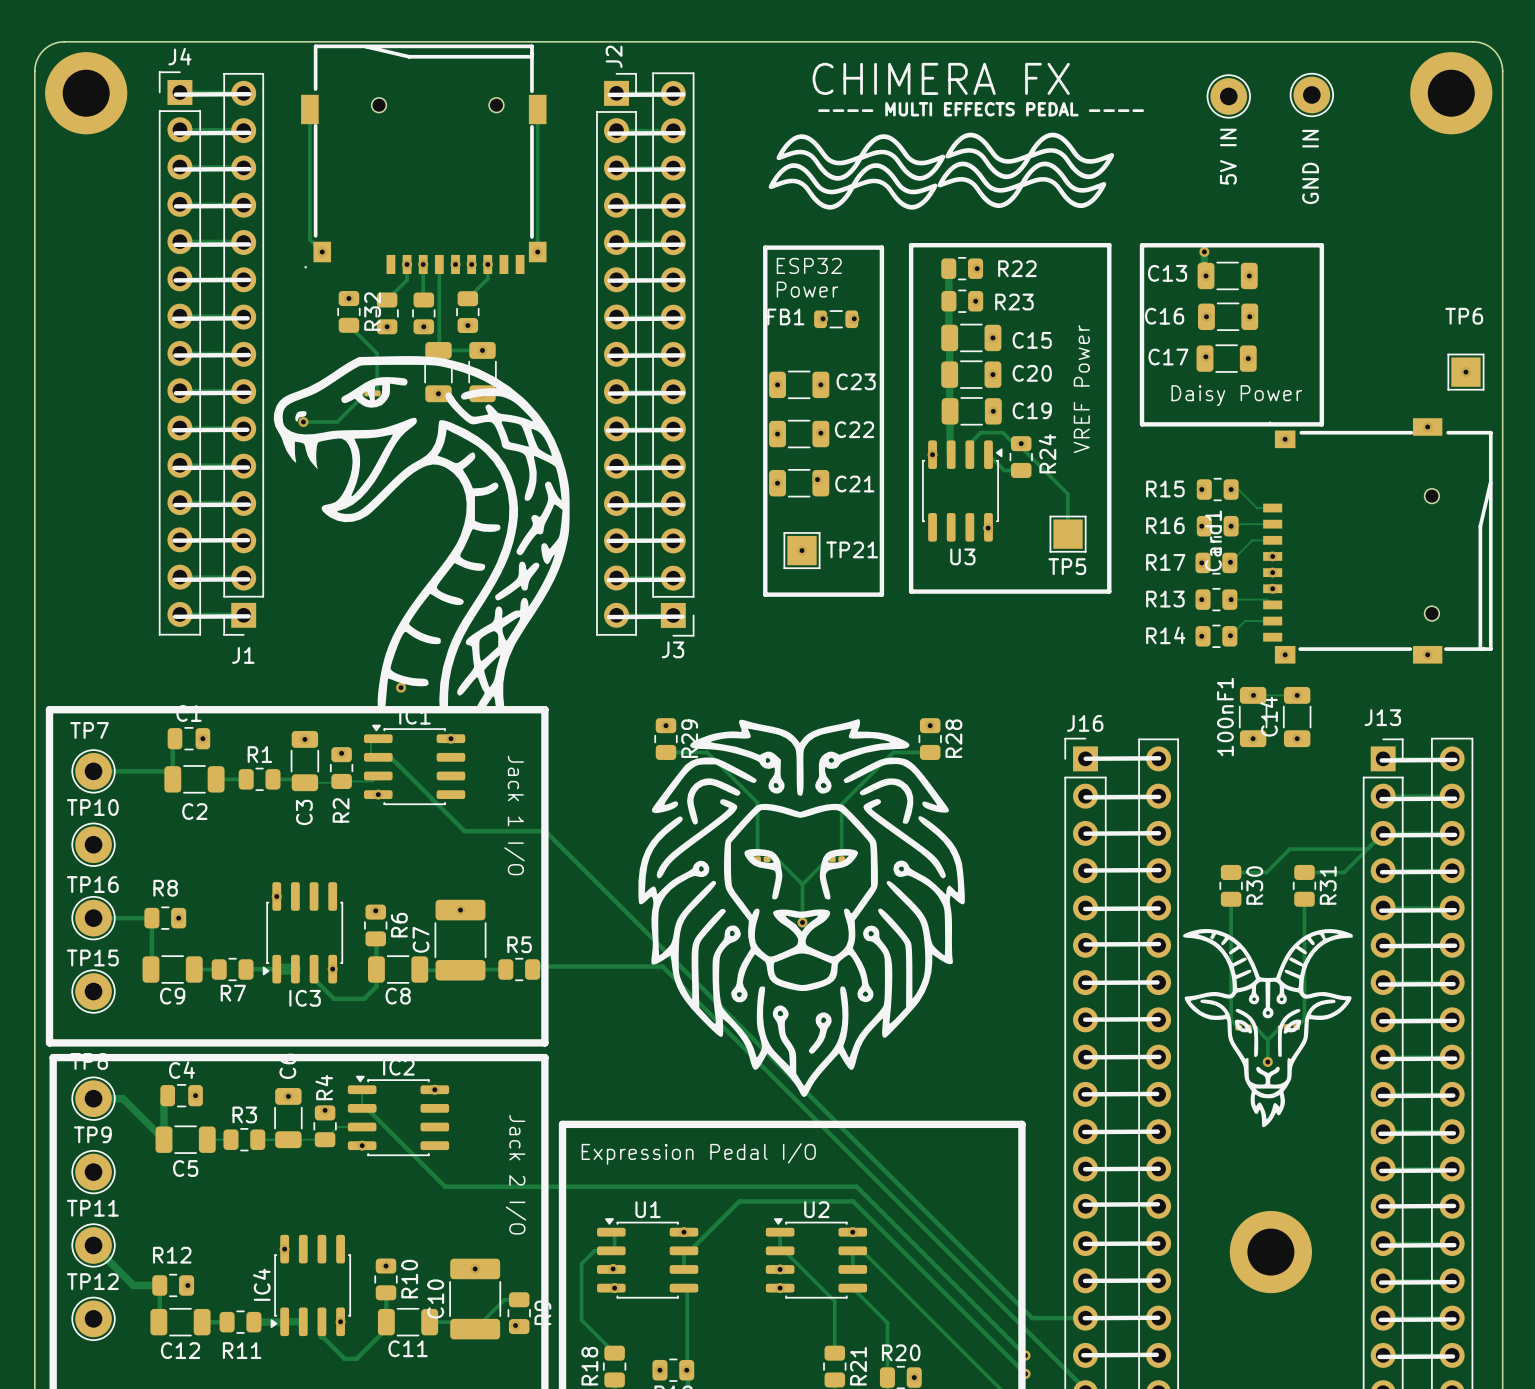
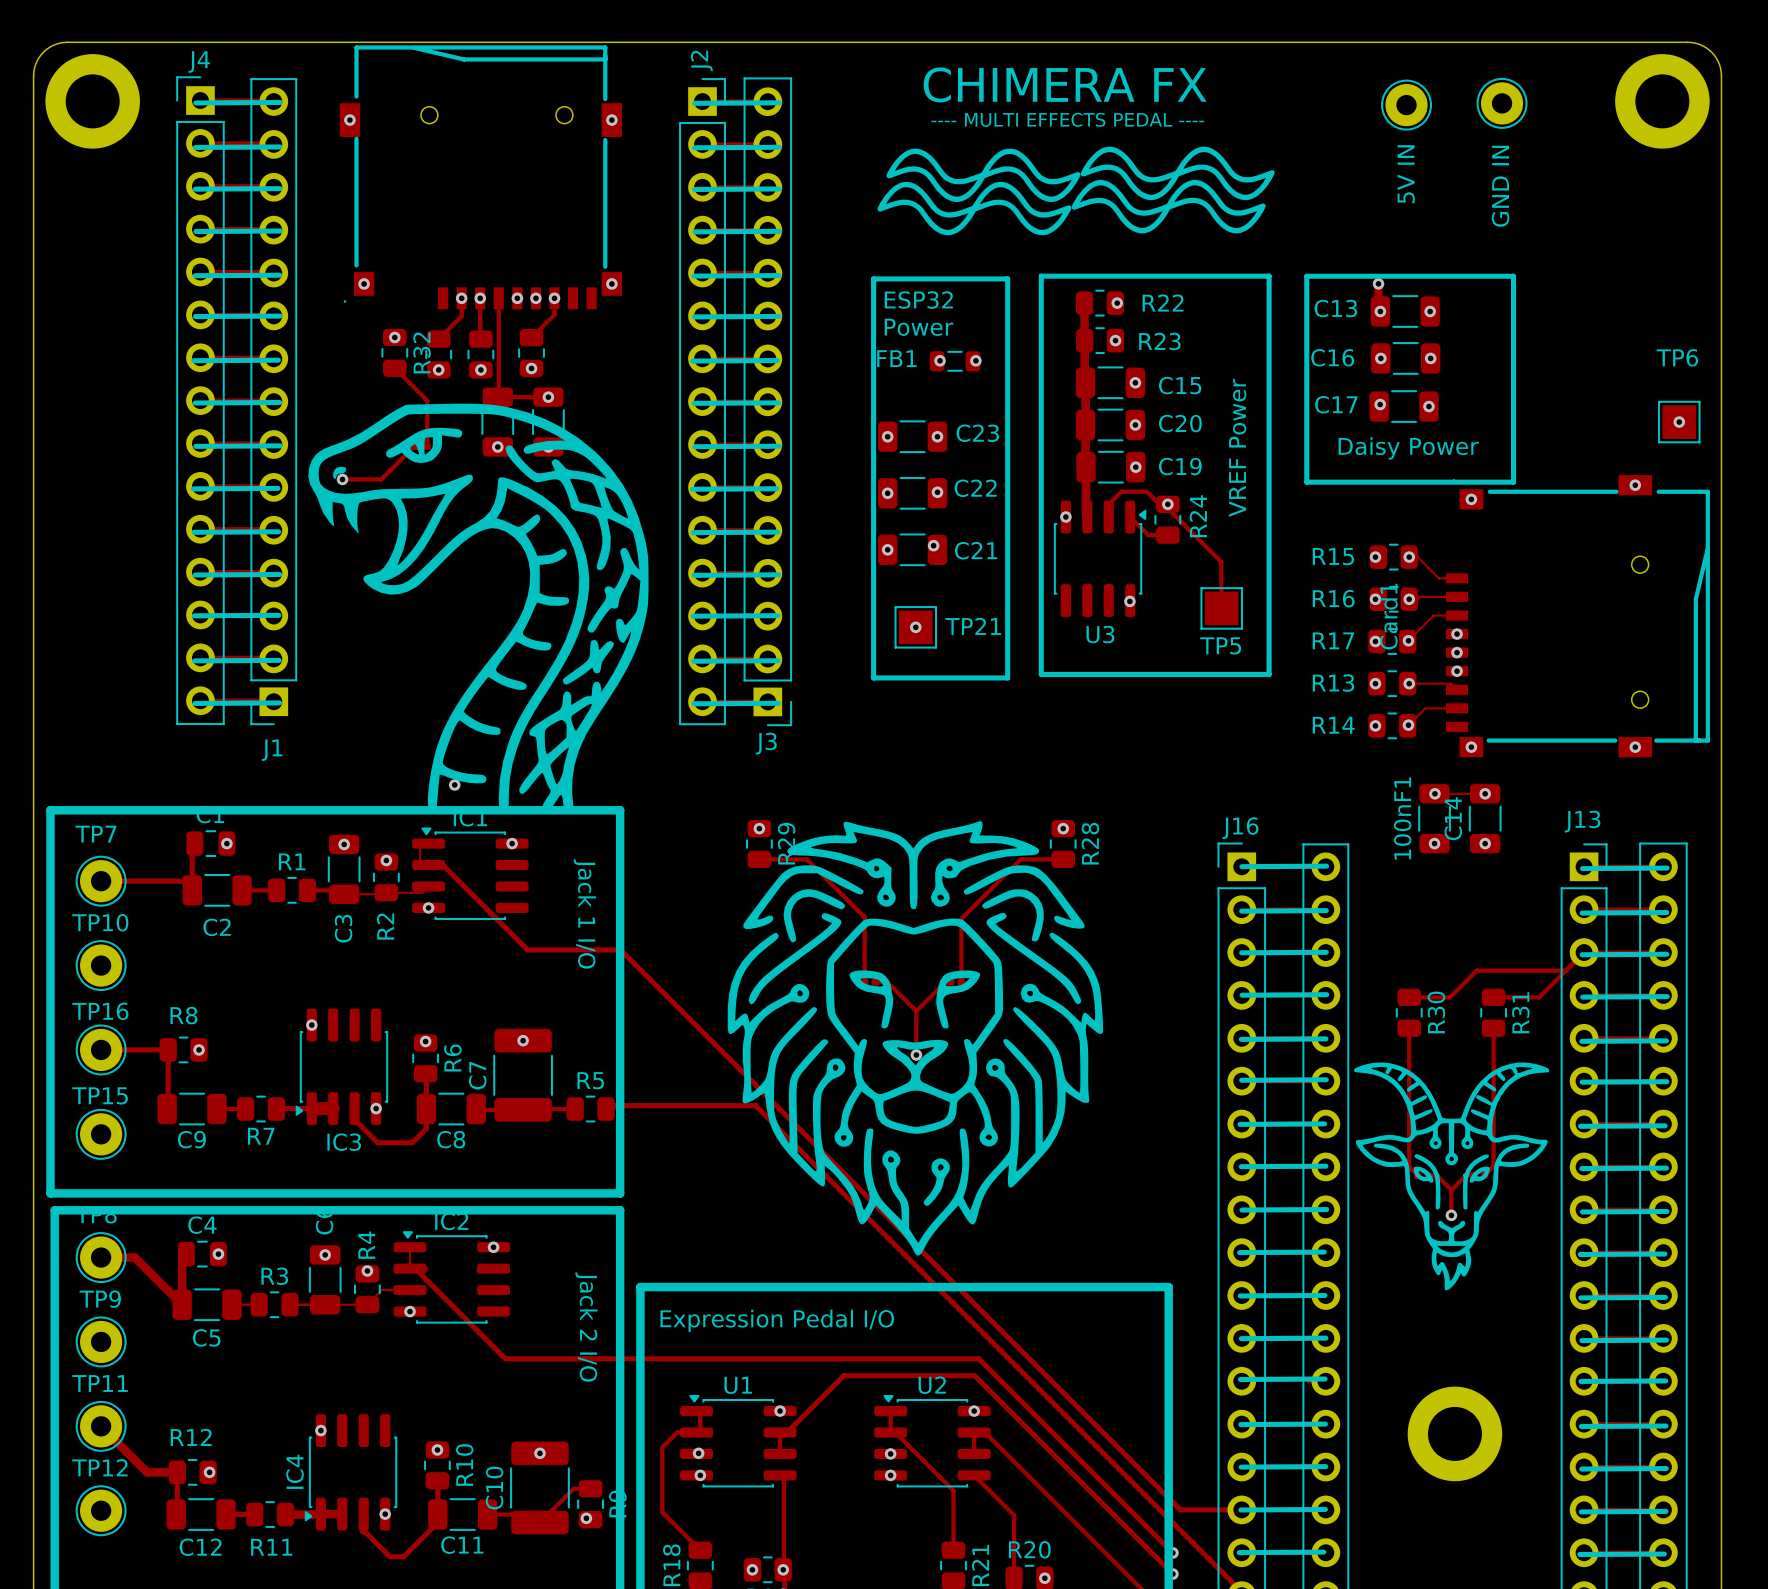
track: (309, 109) (309, 239) (322, 252) -> none
via: none -> (349, 120)
track: (537, 109) (537, 252) -> none
via: none -> (611, 120)

